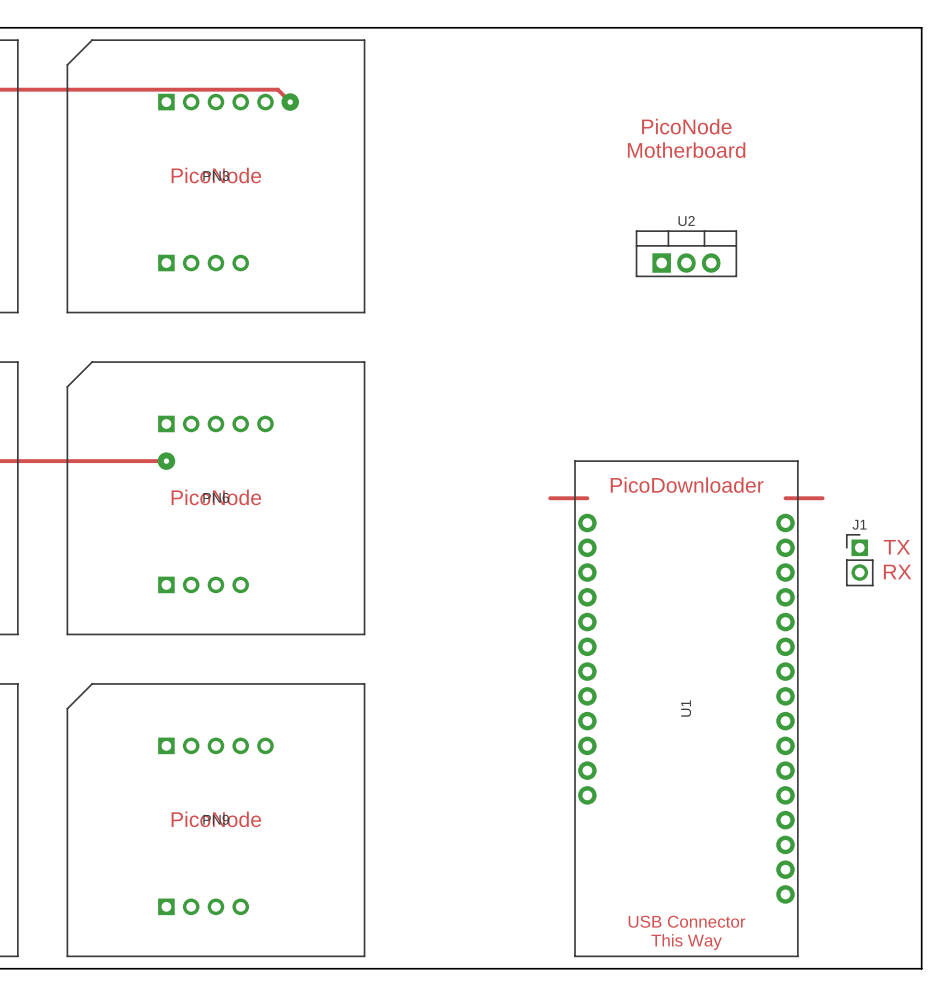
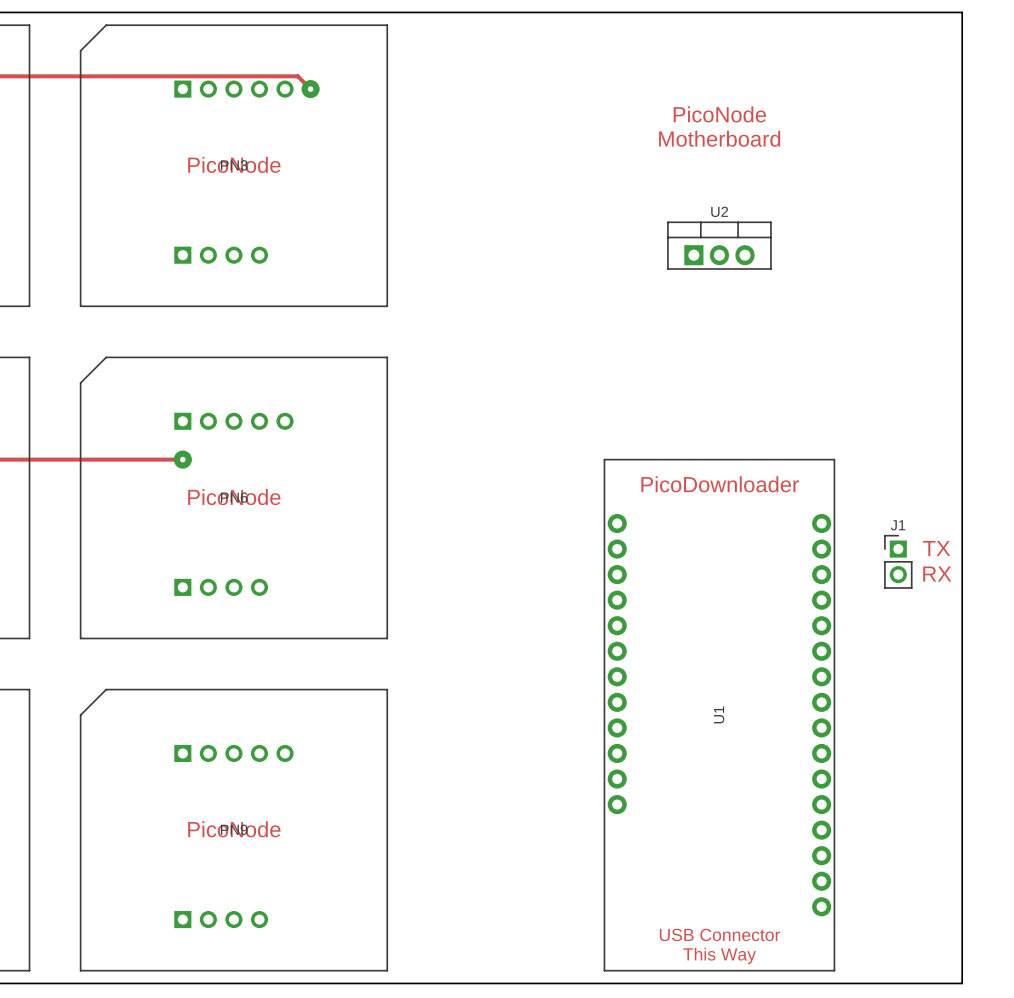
track: (550, 498) (587, 498) -> none
track: (785, 498) (822, 498) -> none

